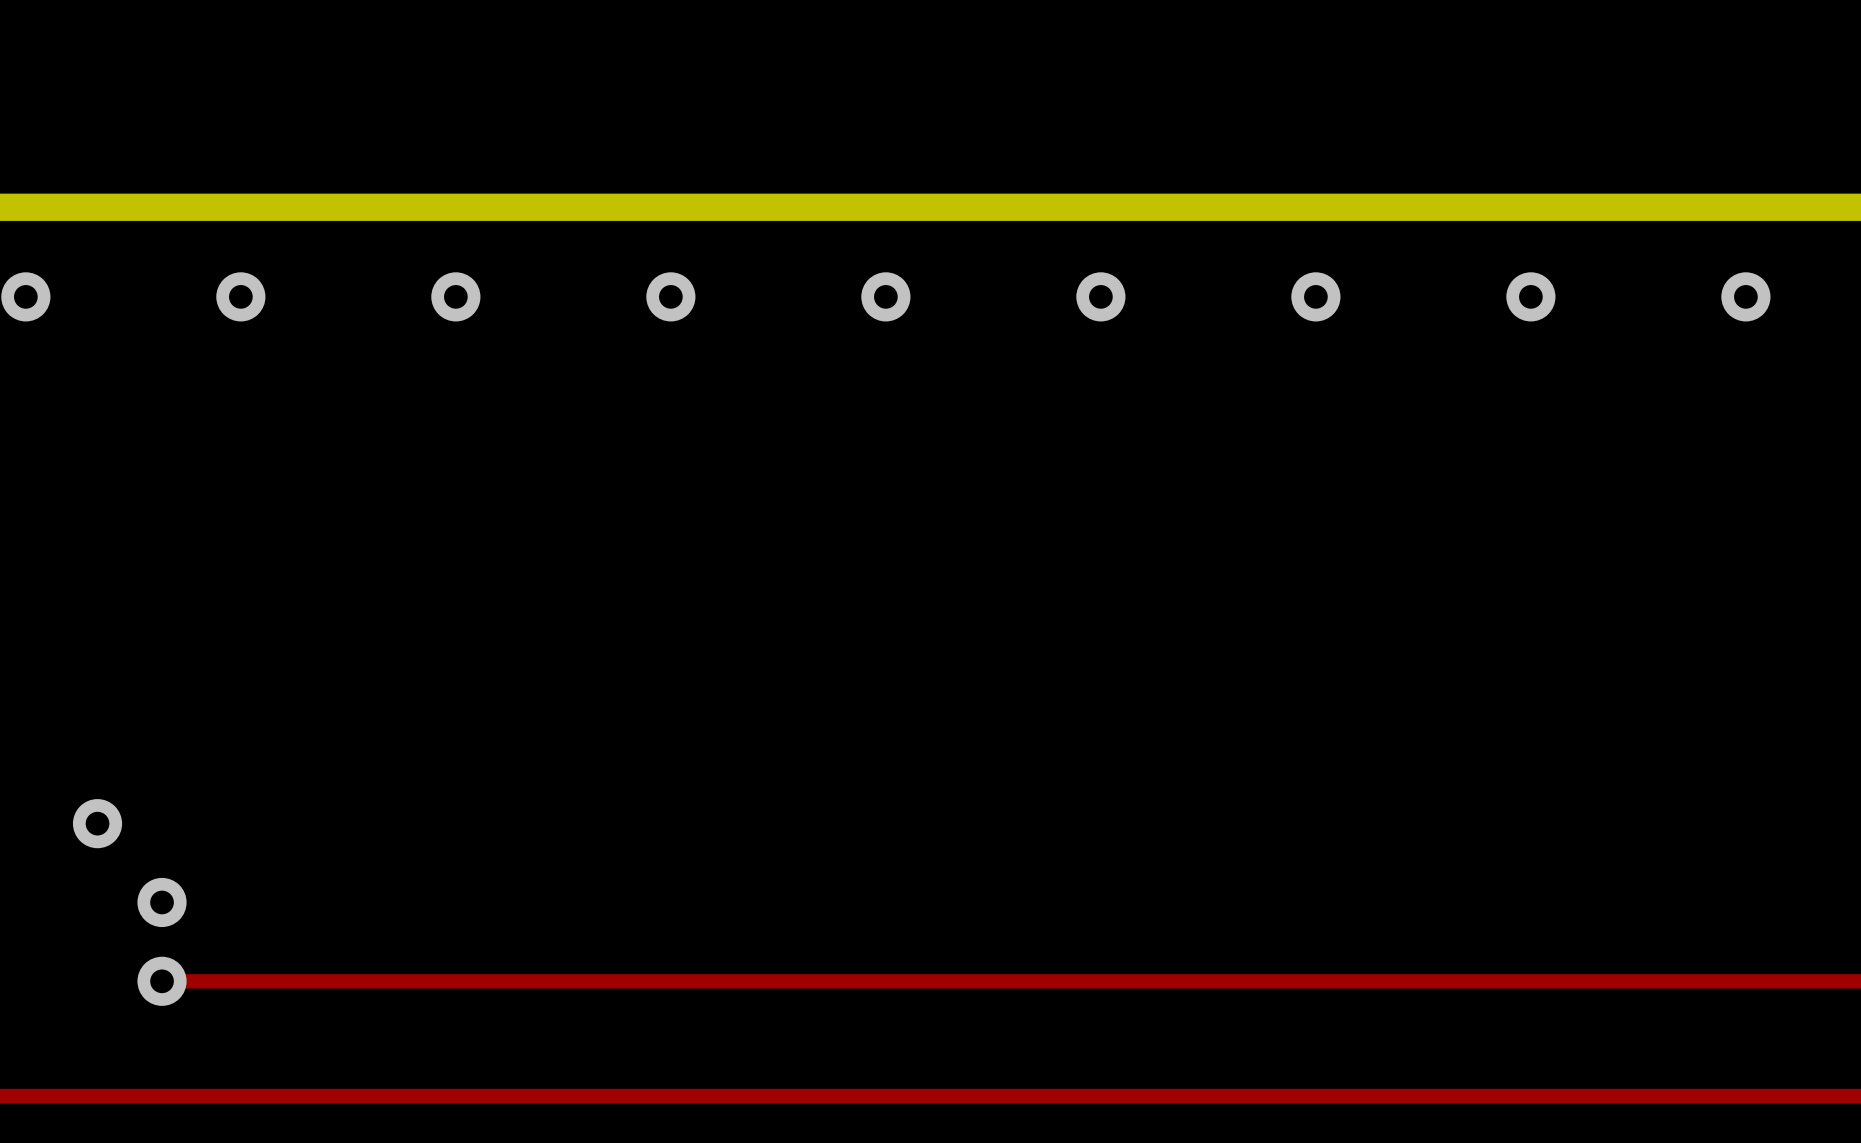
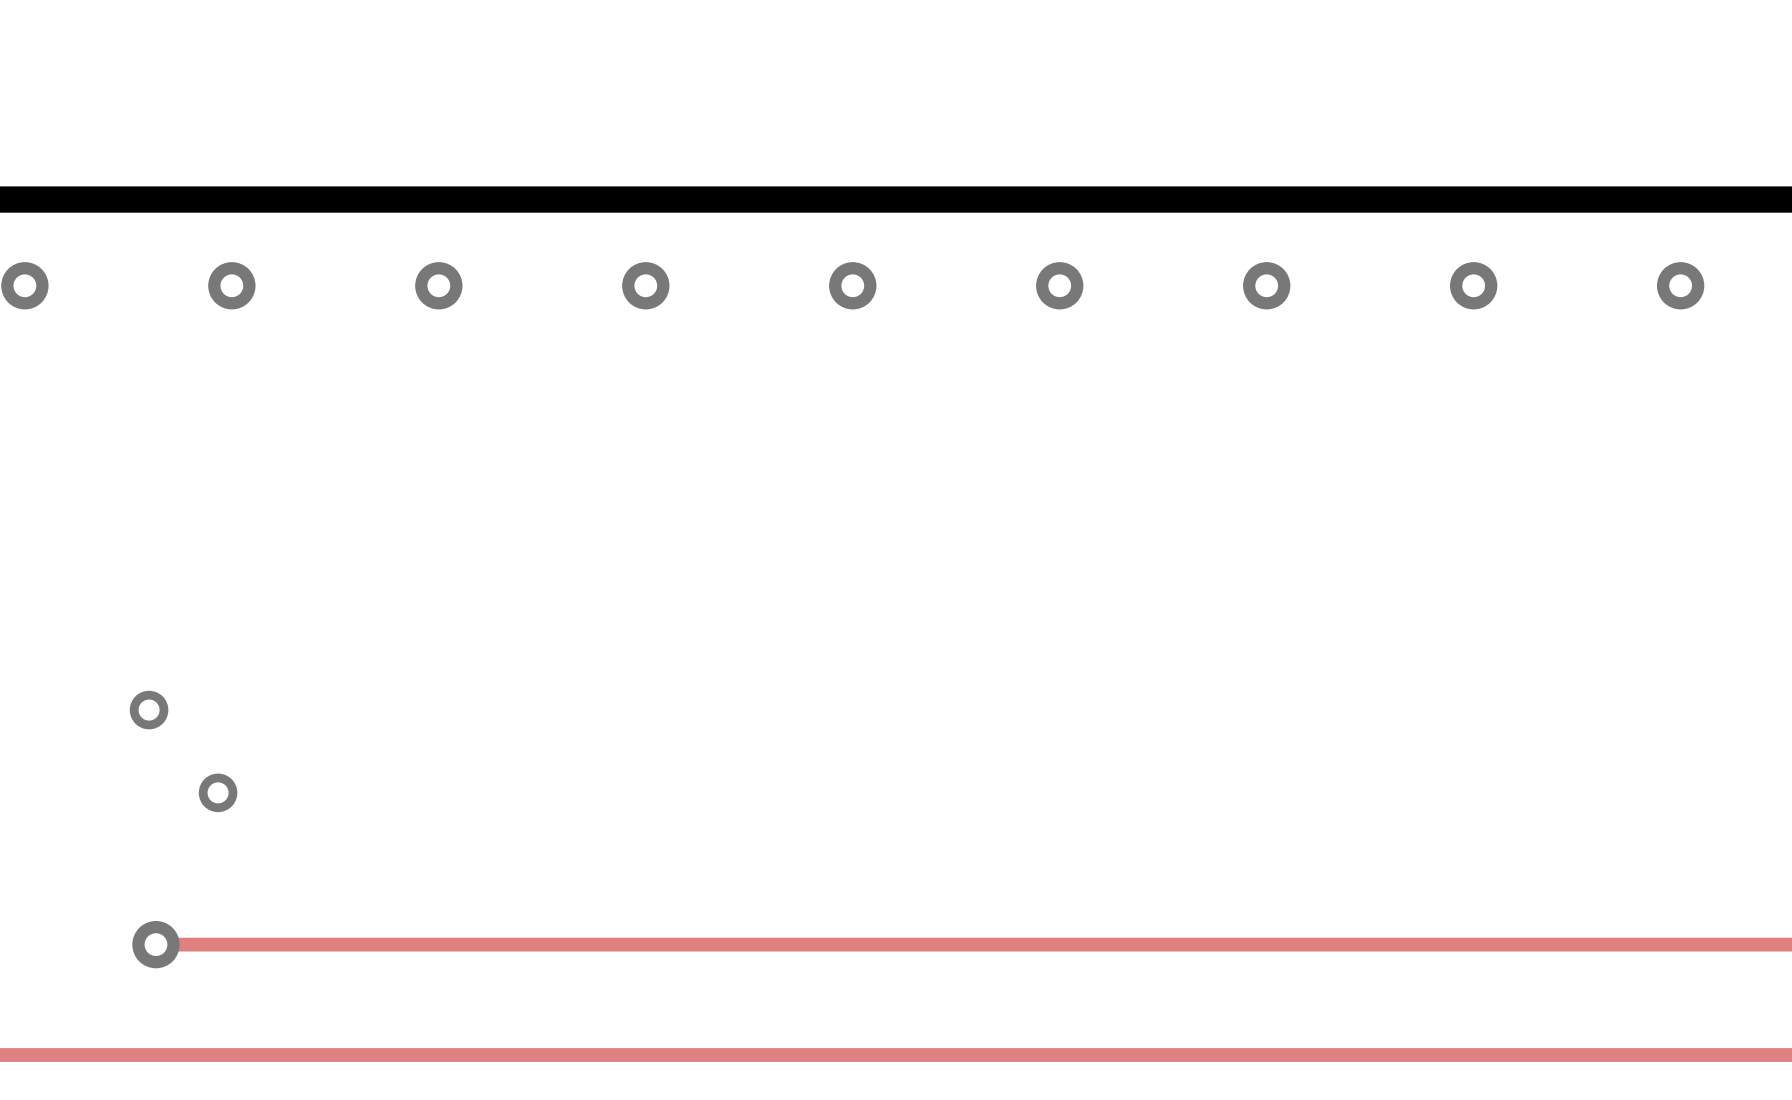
via: none -> (149, 710)
via: (97, 823) -> none
via: none -> (218, 792)
via: (162, 902) -> none

